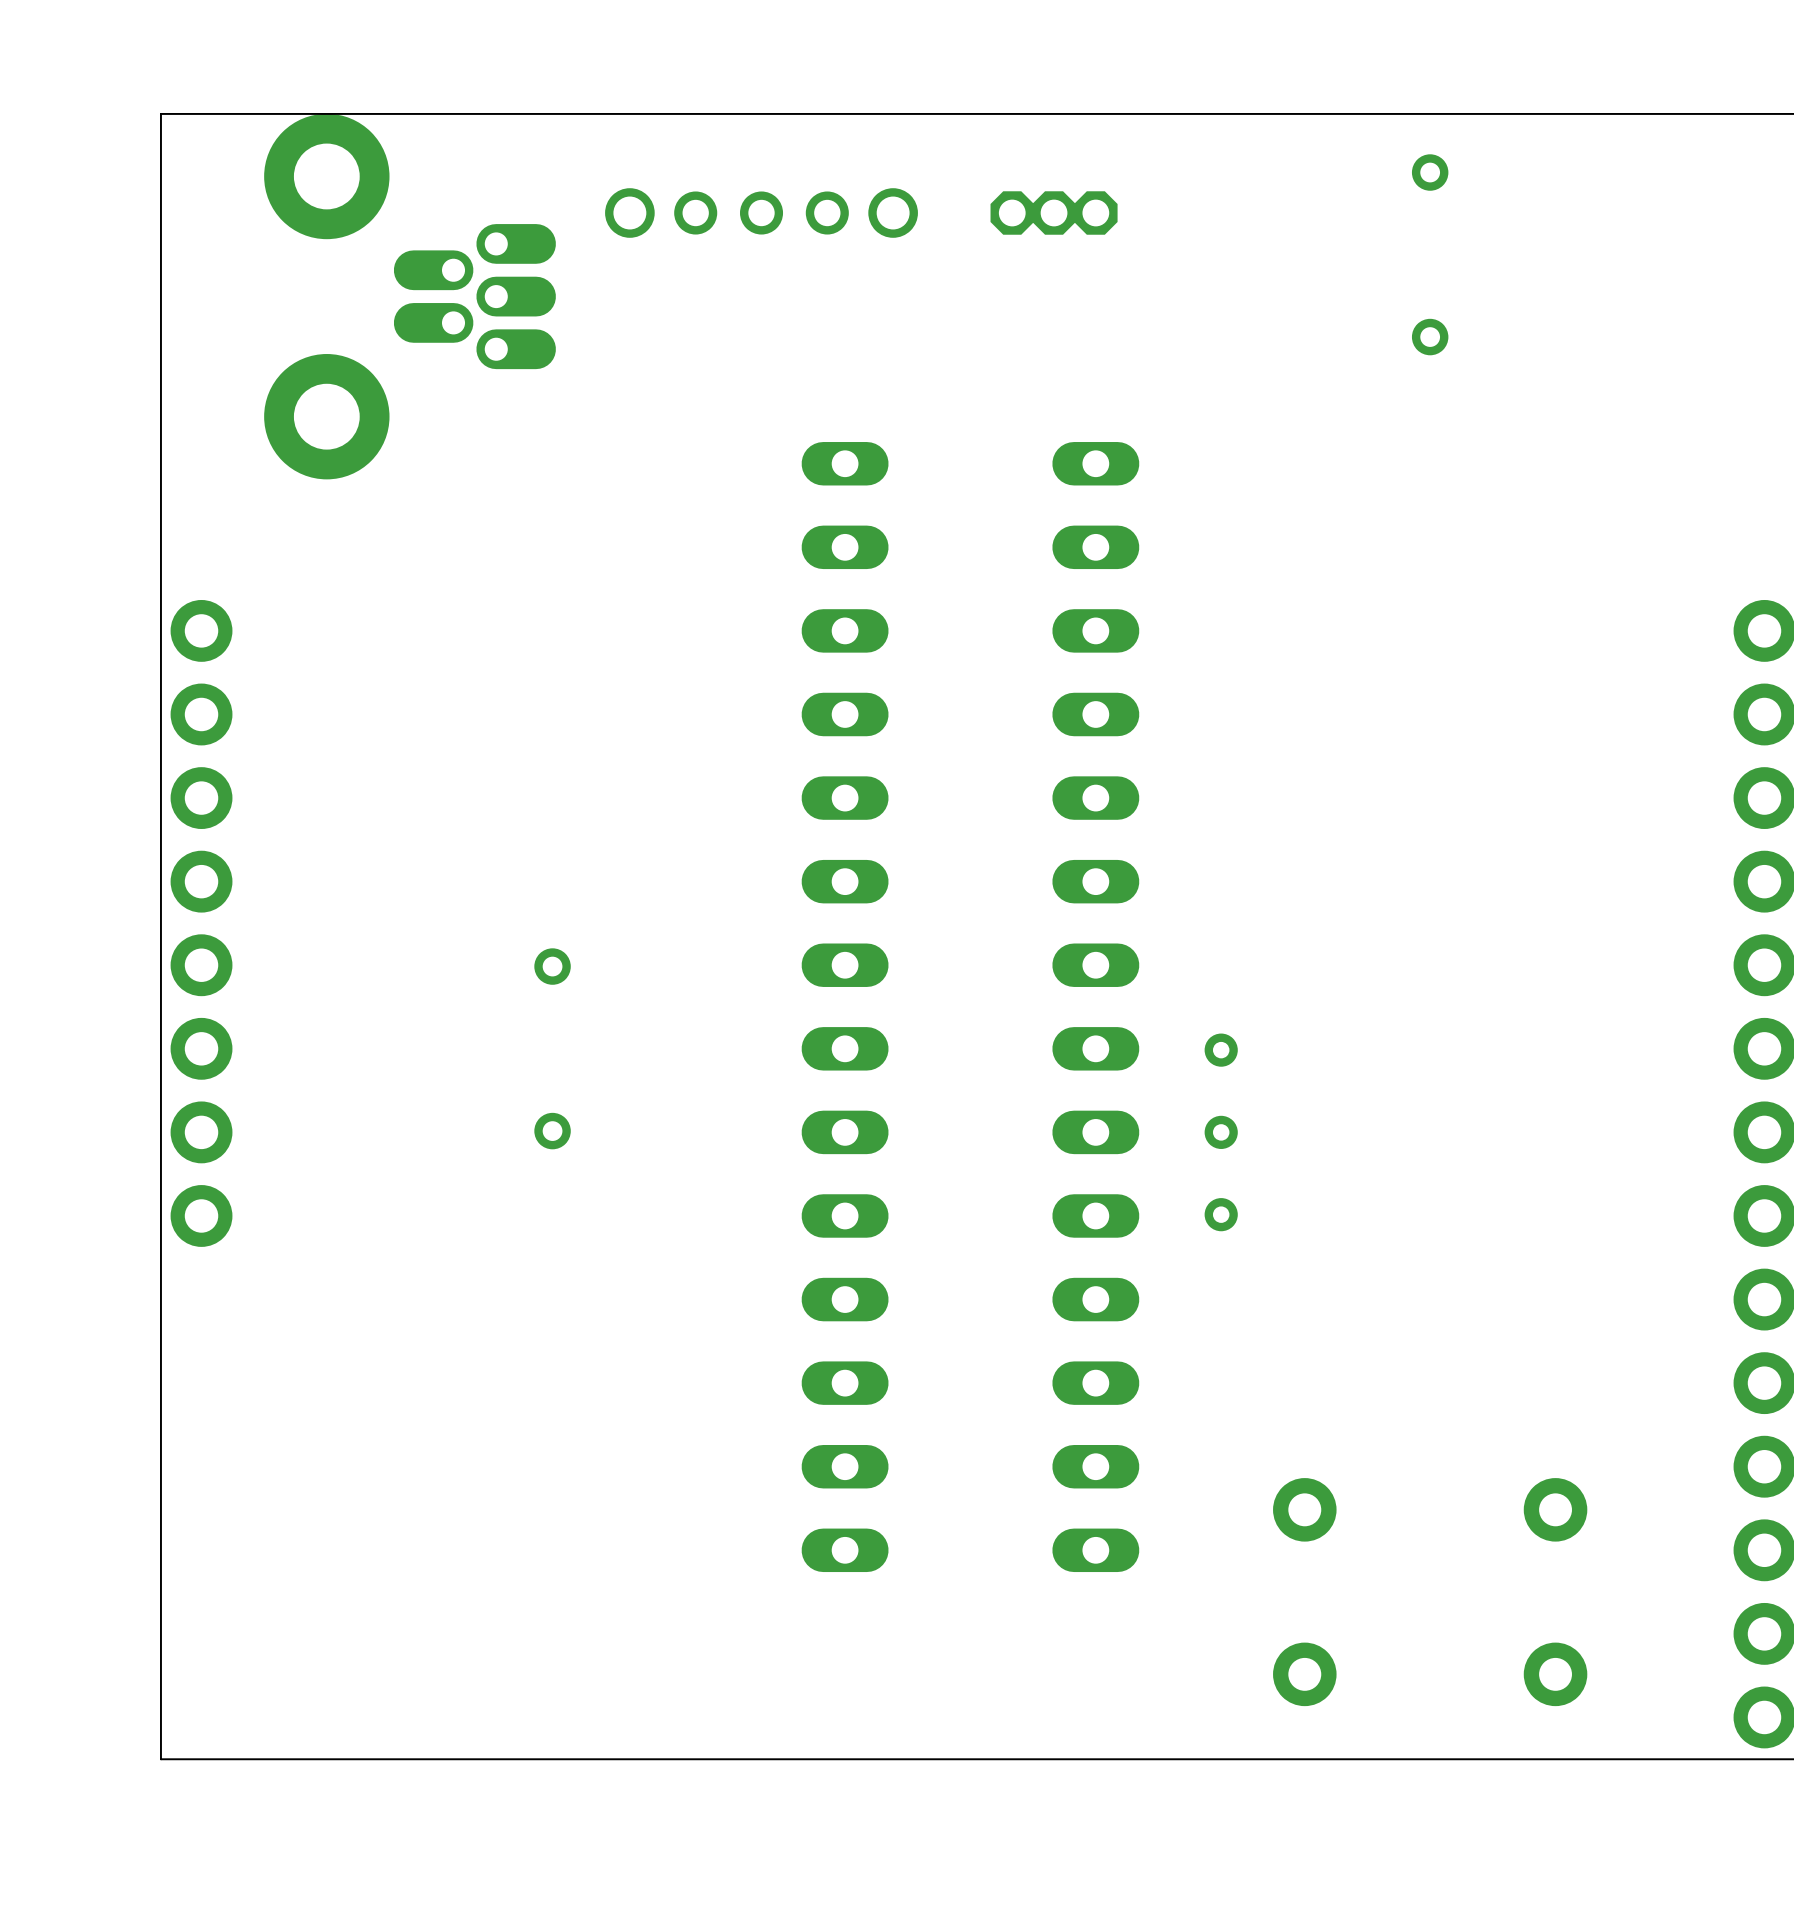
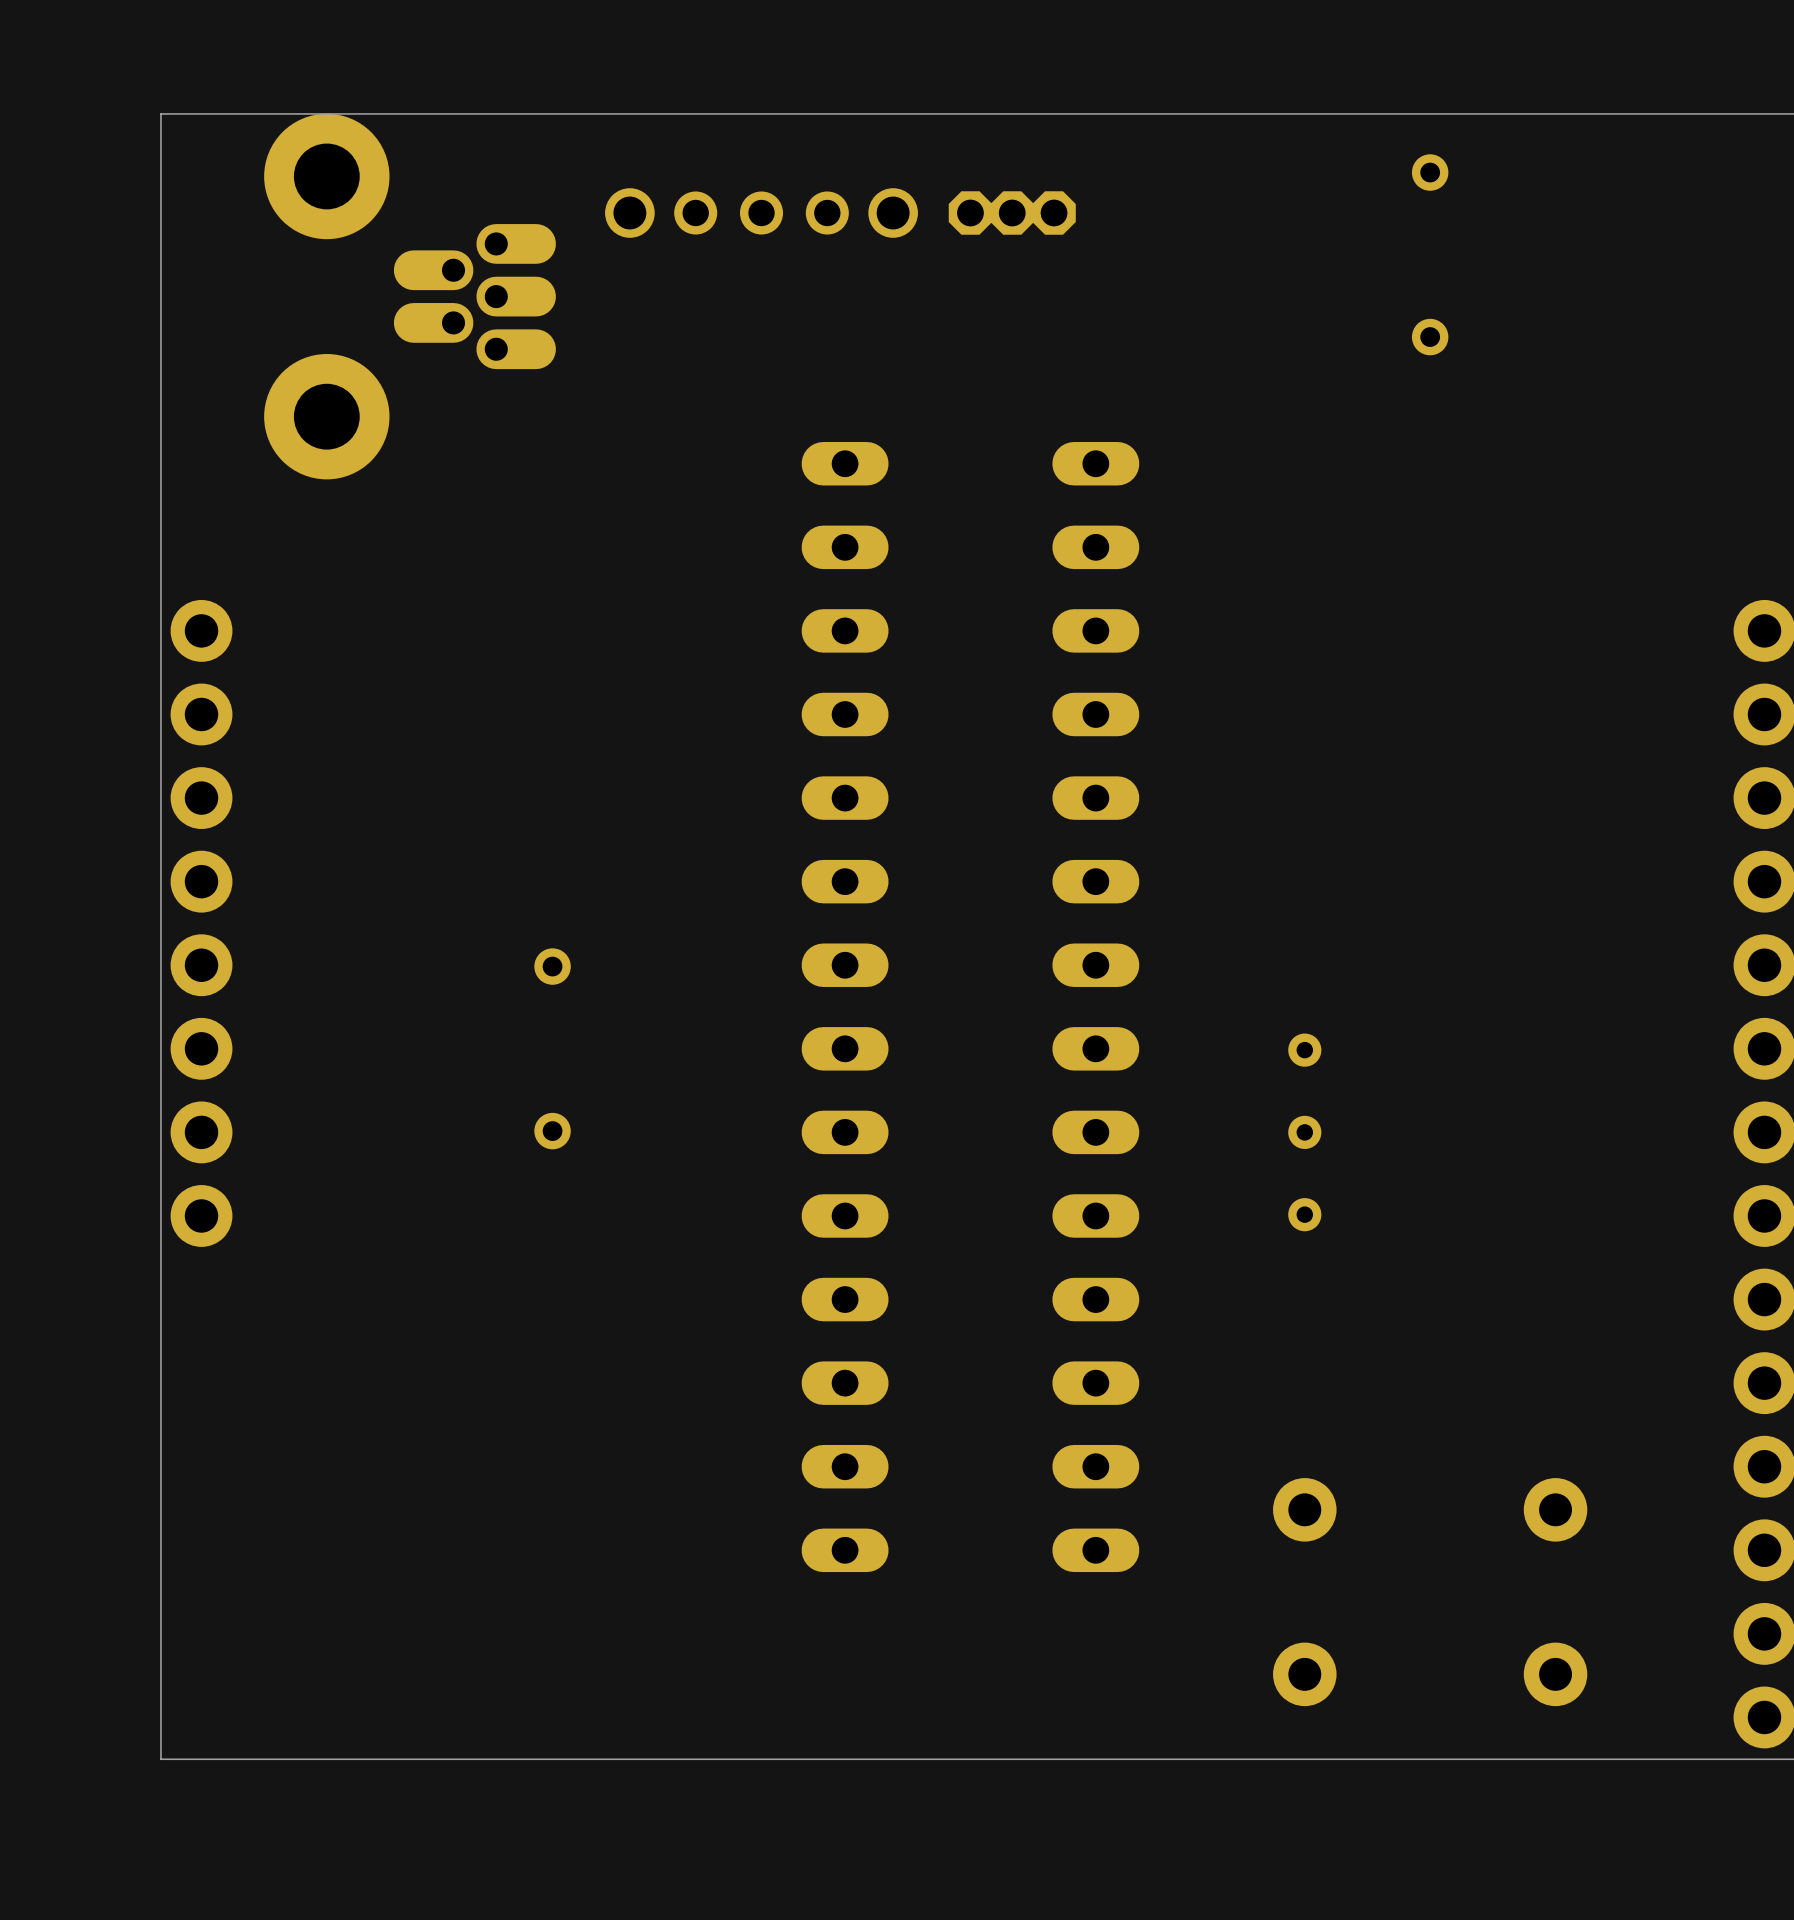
part position: (1054, 213) -> (1012, 213)
part position: (1221, 1132) -> (1304, 1132)

